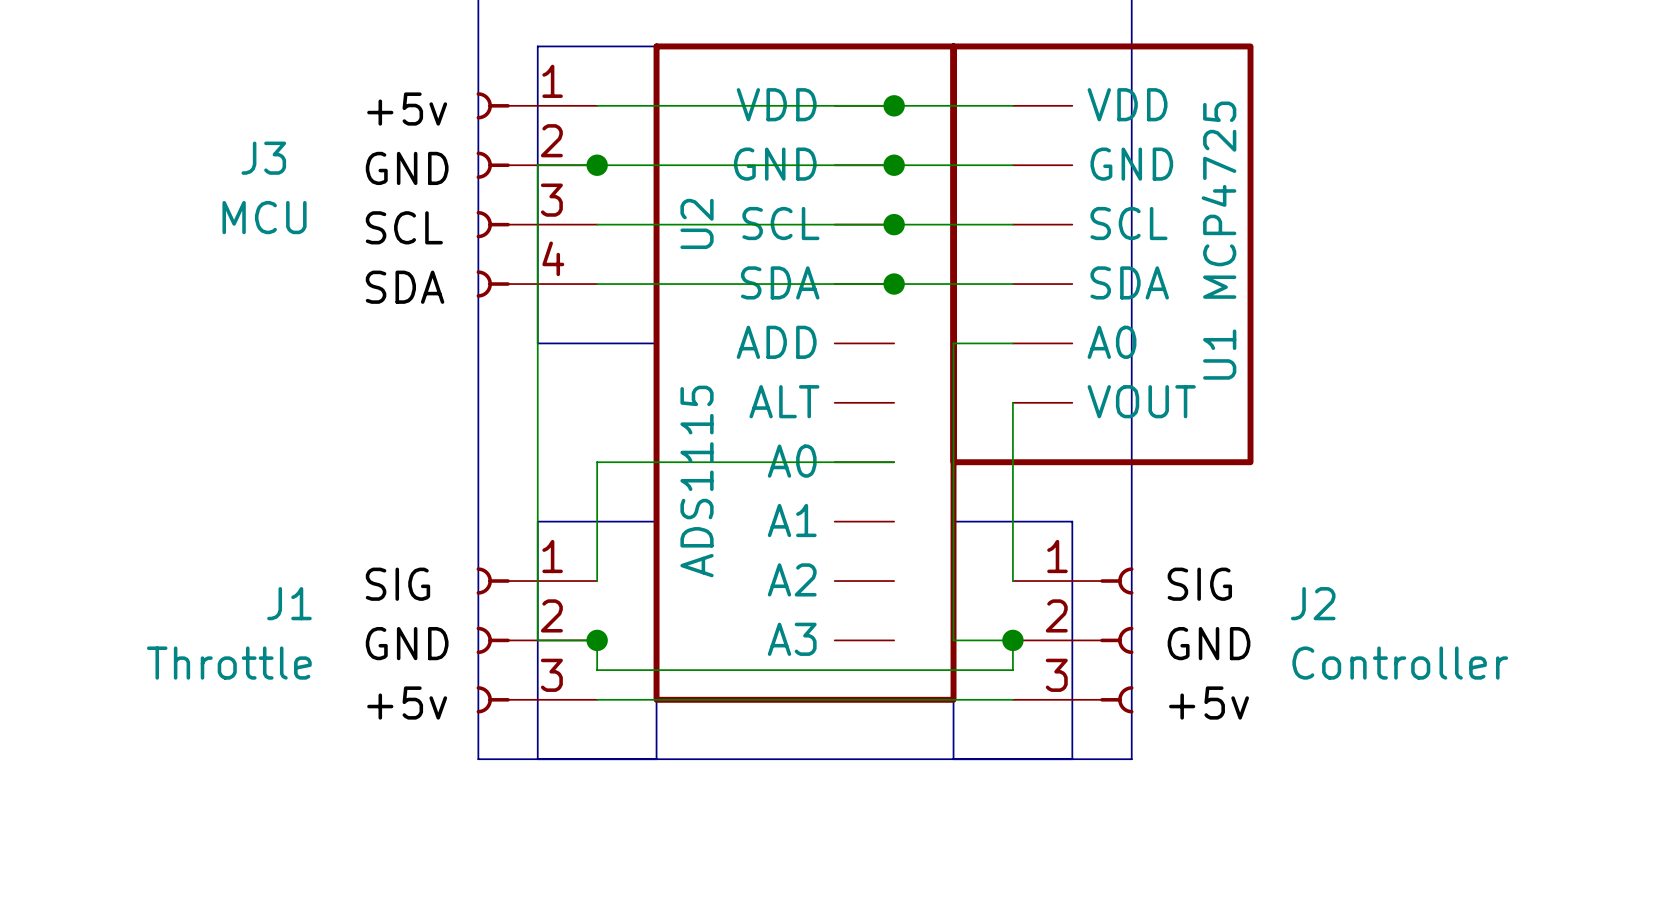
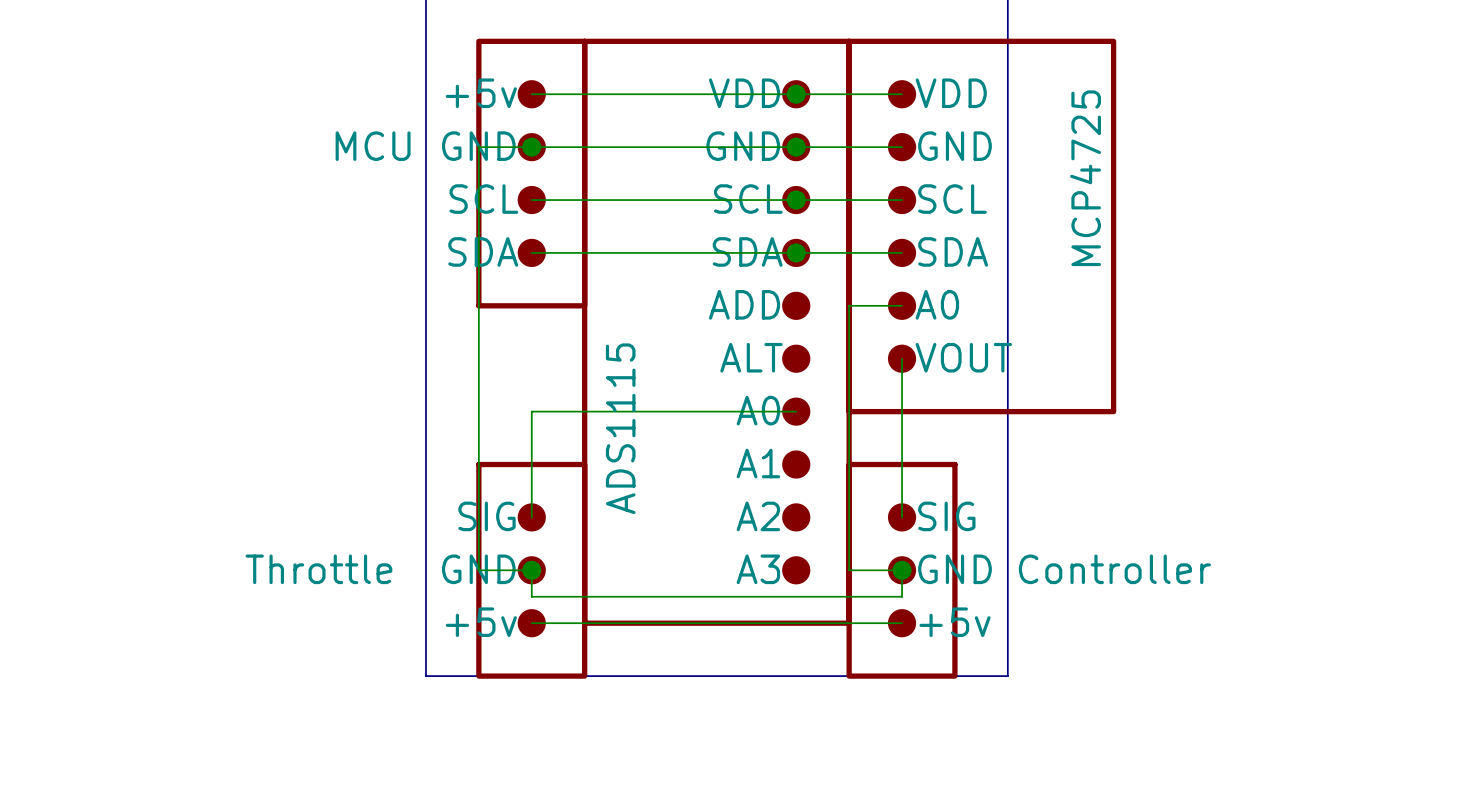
label: +5v (407, 109) -> none
label: GND (407, 168) -> none
J3: MCU (536, 194) -> none
part: none -> MCU (531, 173)
label: SCL (404, 227) -> none
U1: MCP4725 (1102, 254) -> none
part: none -> MCP4725 (981, 226)
label: SDA (405, 287) -> none
U2: ADS1115 (805, 373) -> none
part: none -> ADS1115 (716, 332)
label: SIG (397, 584) -> none
label: SIG (1199, 584) -> none
J1: Throttle (536, 640) -> none
part: none -> Throttle (531, 570)
part: none -> Controller (902, 570)
J2: Controller (1073, 640) -> none
label: GND (407, 643) -> none
label: GND (1209, 643) -> none
label: +5v (407, 703) -> none
label: +5v (1209, 703) -> none

